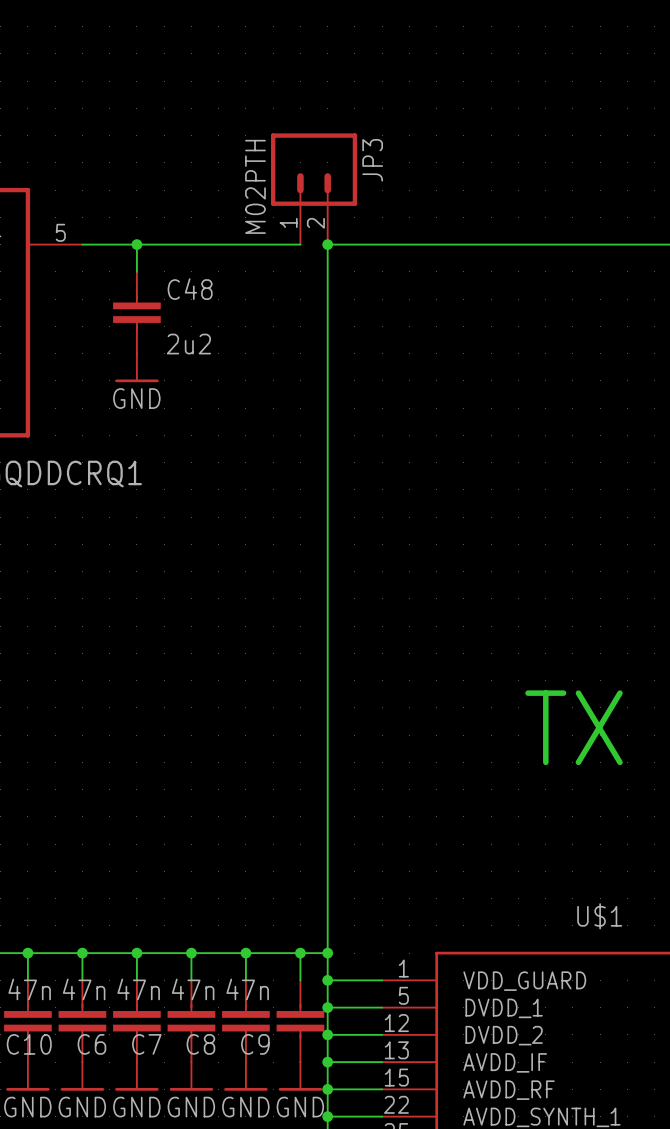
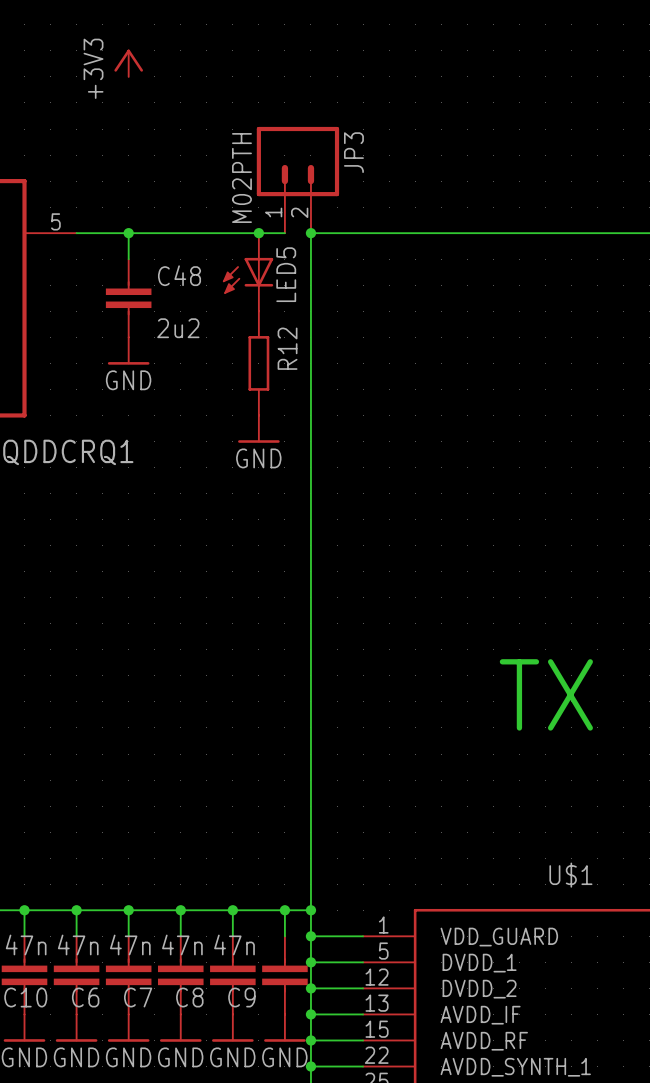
power symbol: none -> +3V3 (128, 63)
junction: none -> (258, 233)
LED5: none -> (248, 272)
R12: none -> (258, 363)
power symbol: none -> GND (258, 429)

